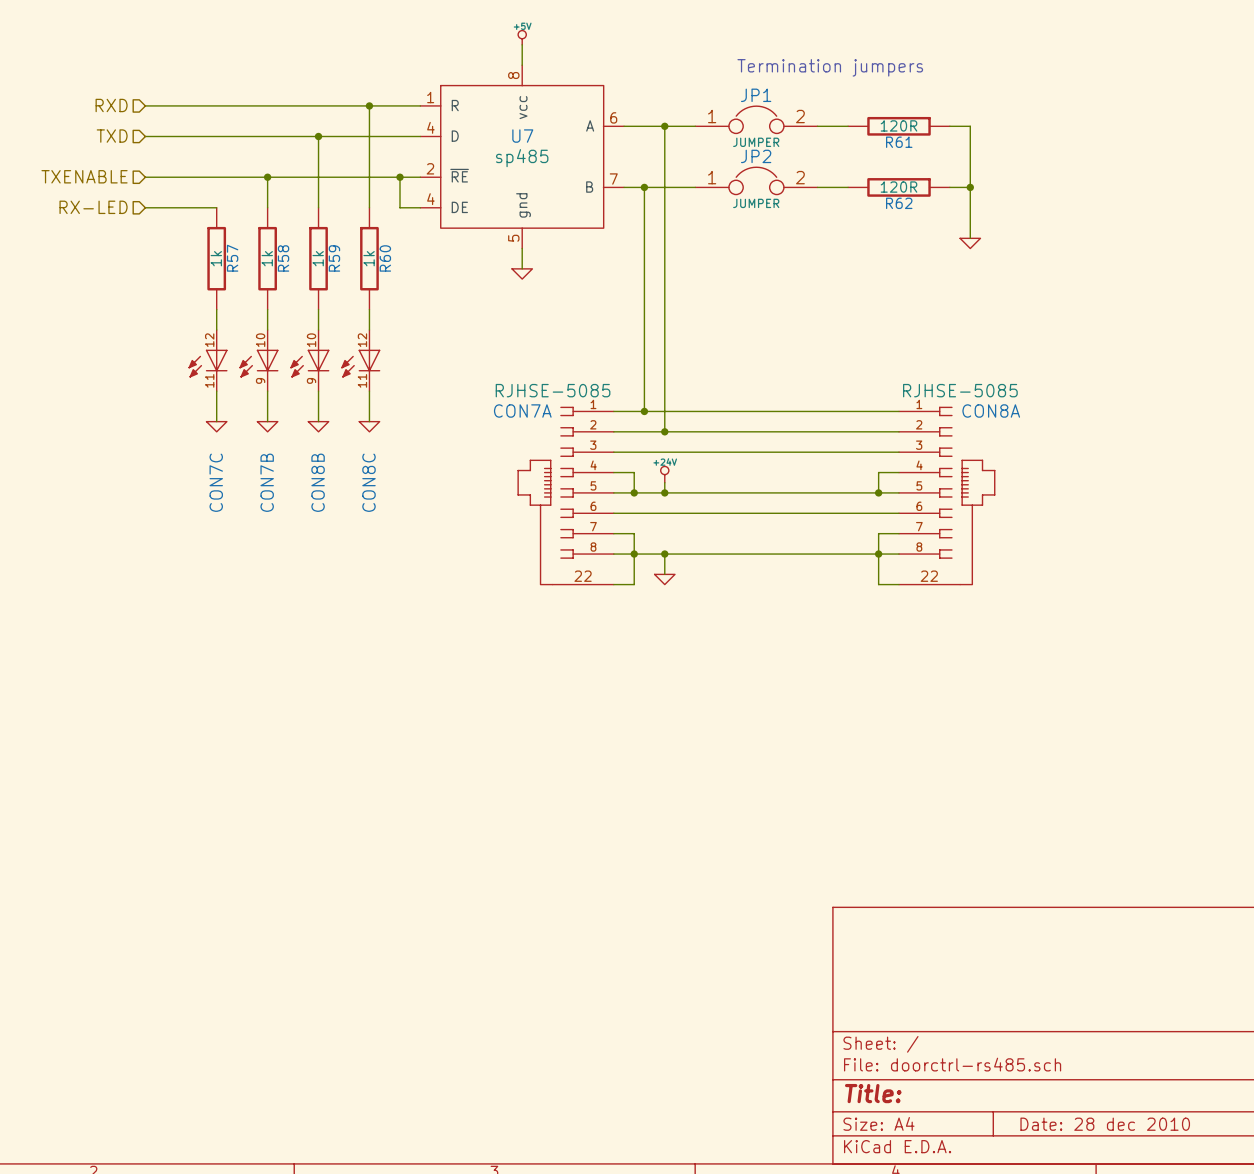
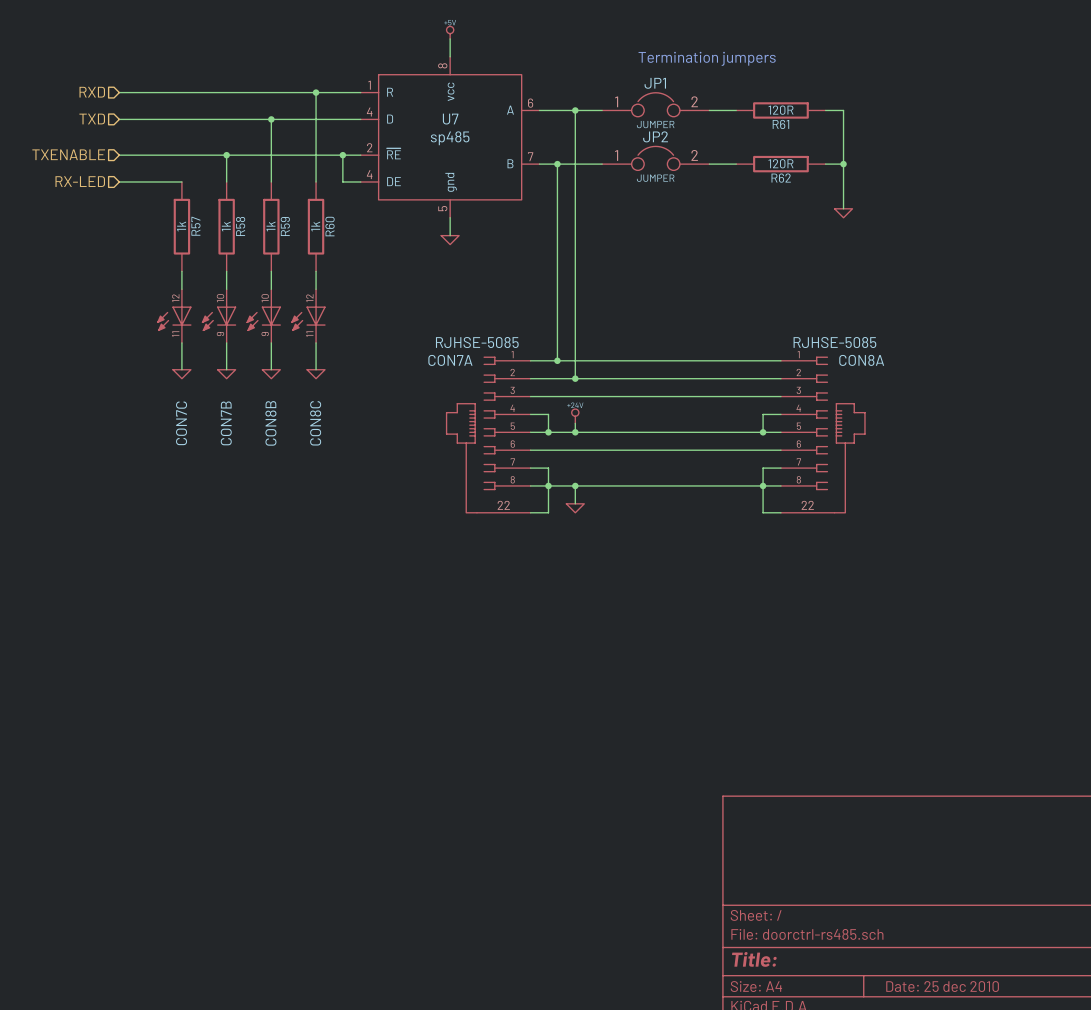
title block: Date: 28 dec 2010 (1105, 1124) -> Date: 25 dec 2010 (942, 986)

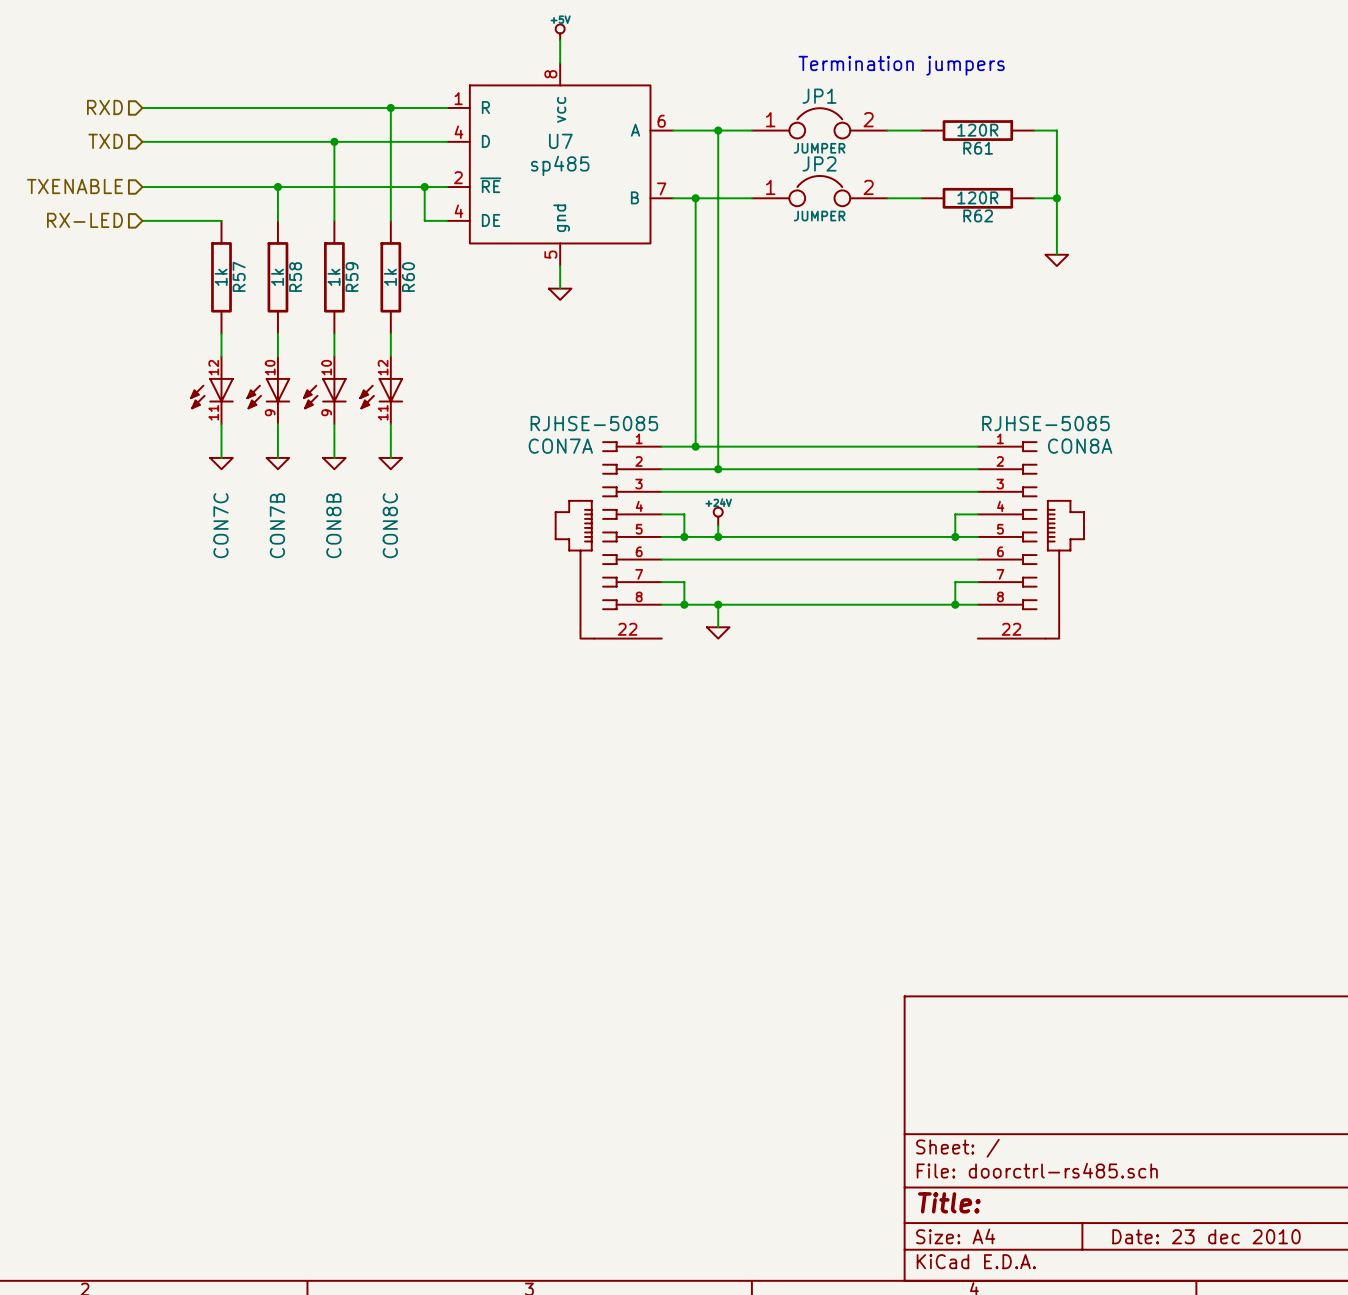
wire: (548, 485) (548, 512) (530, 512) -> none
wire: (763, 485) (763, 512) (780, 512) -> none
title block: Date: 25 dec 2010 (942, 986) -> Date: 23 dec 2010 (1206, 1236)

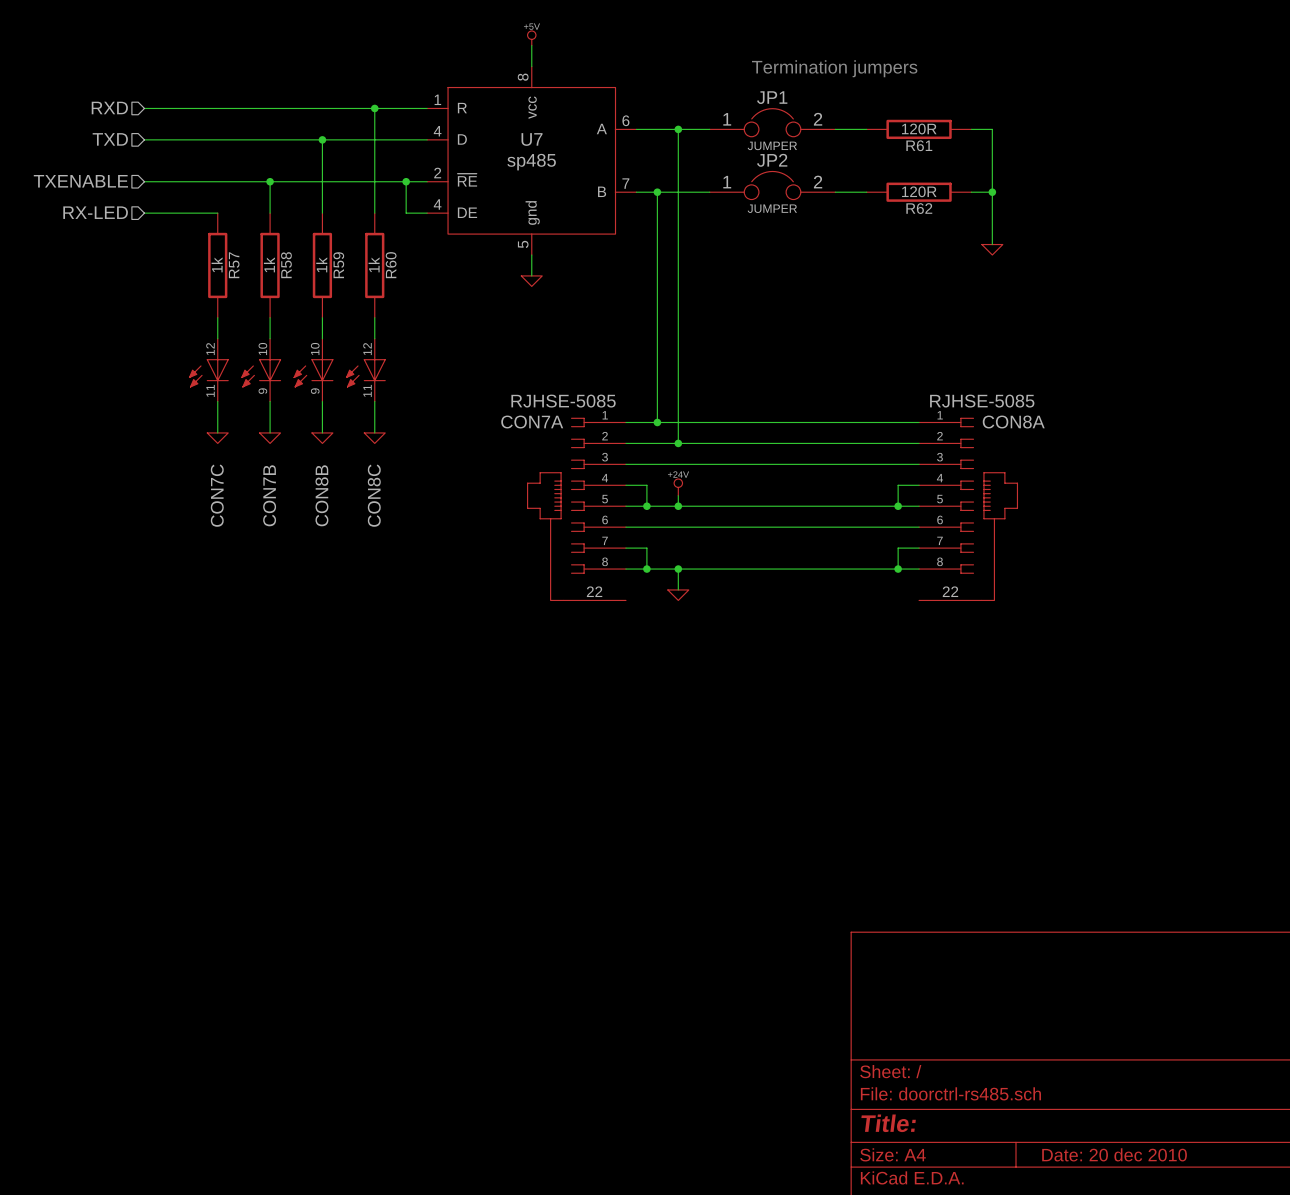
title block: Date: 23 dec 2010 (1206, 1236) -> Date: 20 dec 2010 (1114, 1154)

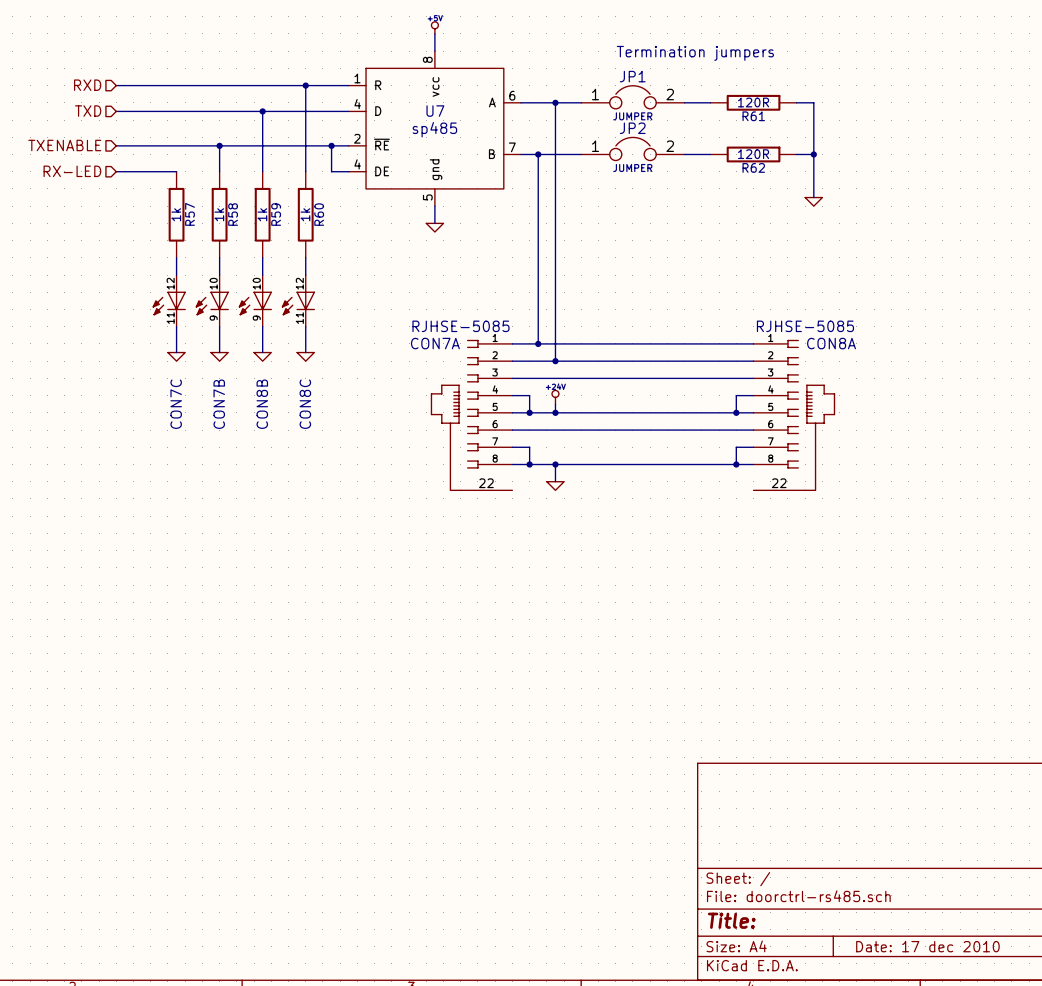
title block: Date: 20 dec 2010 (1114, 1154) -> Date: 17 dec 2010 (927, 946)

